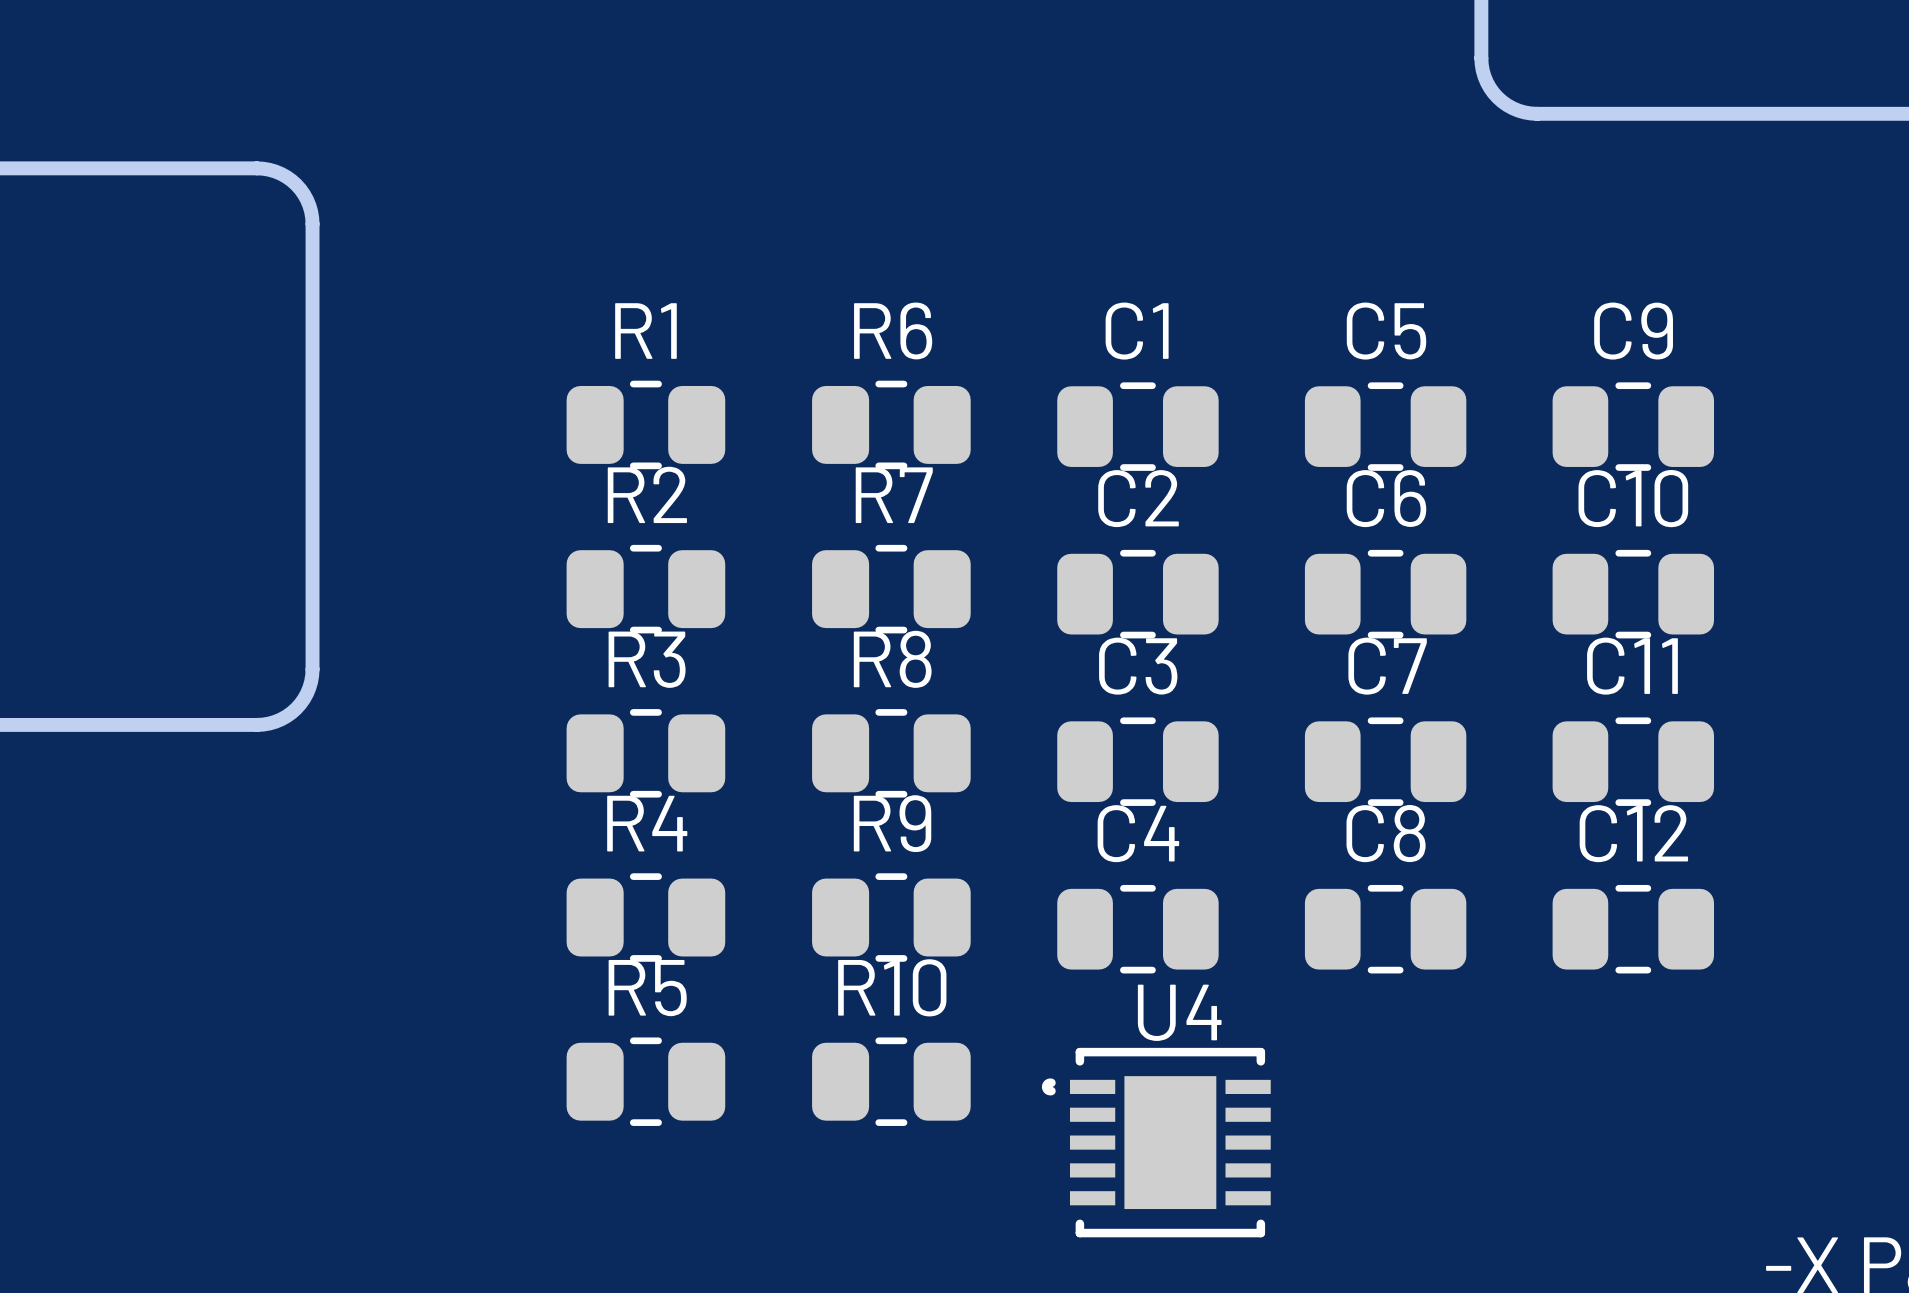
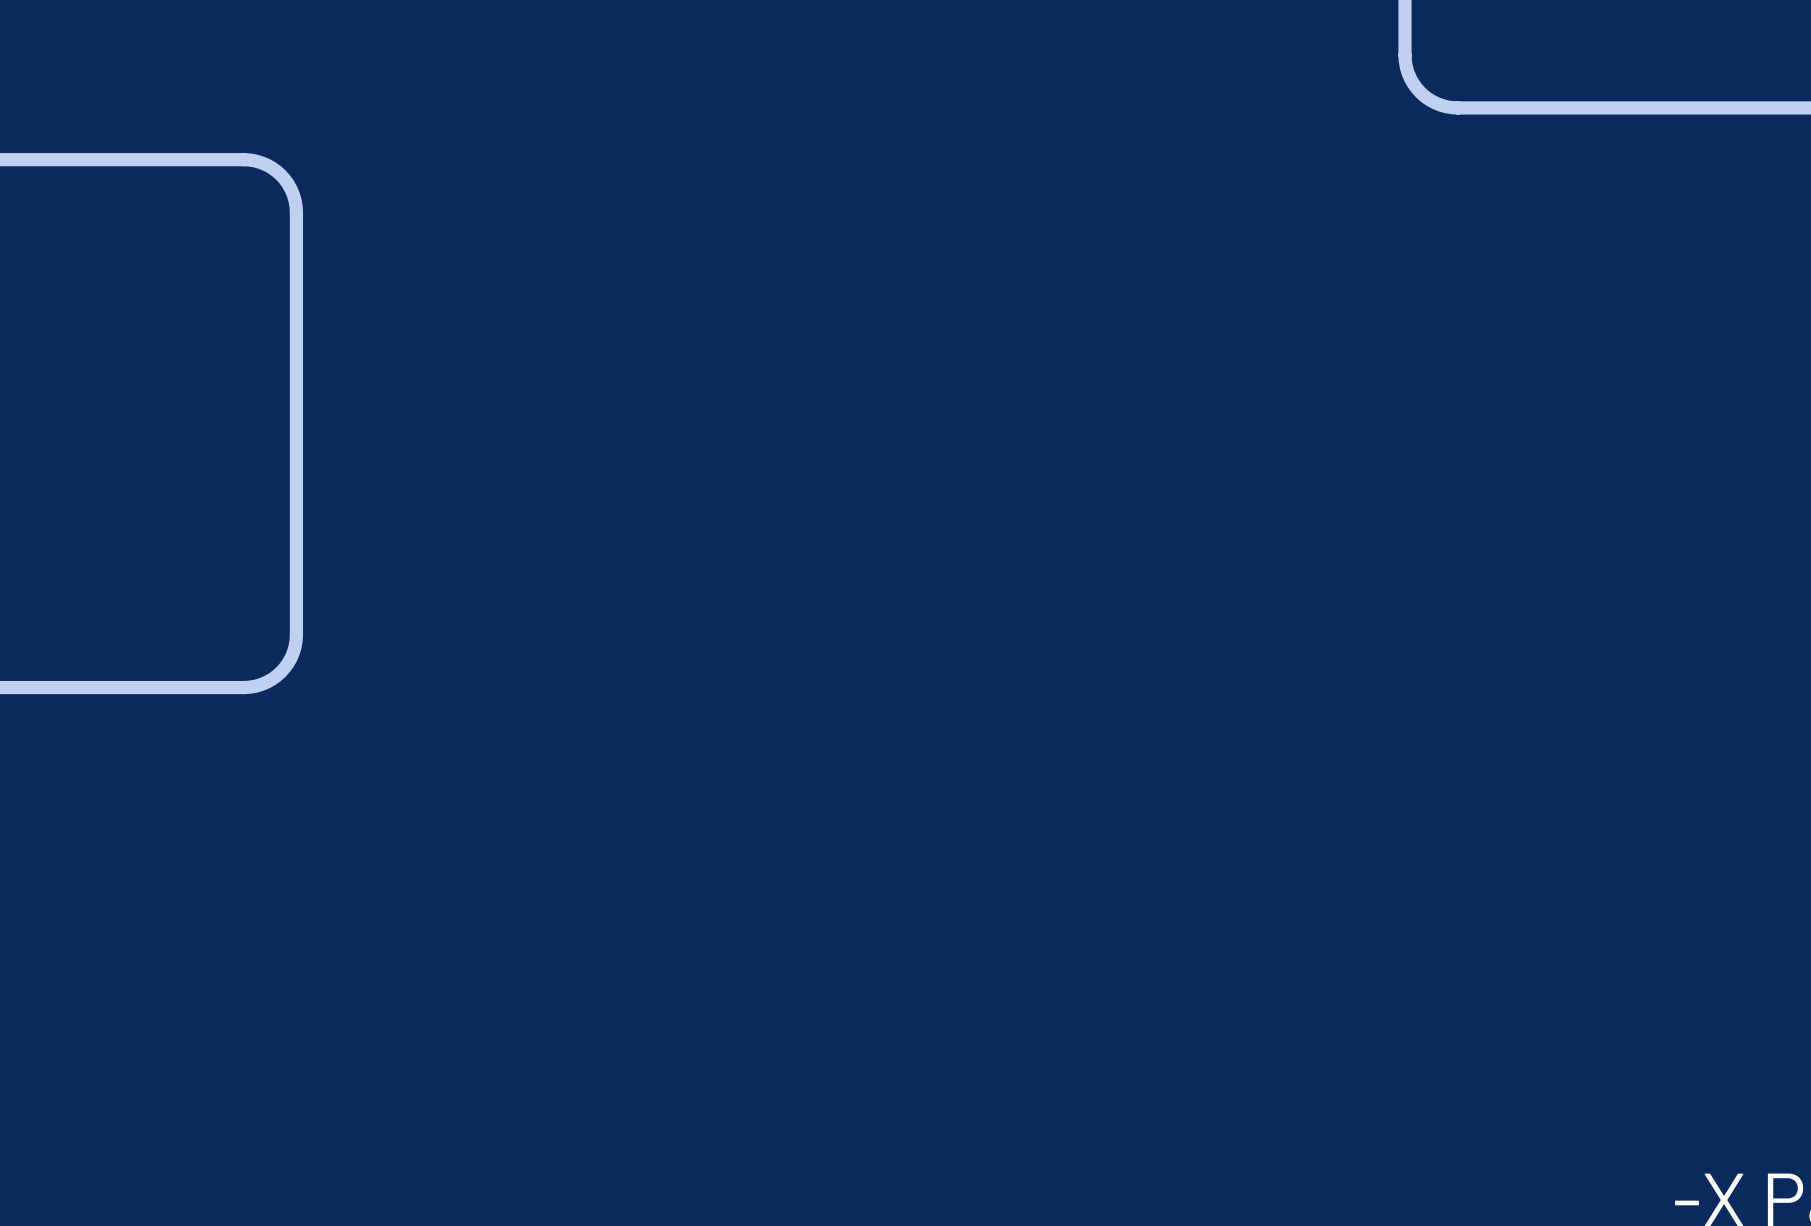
R1: (645, 424) -> none
R6: (891, 424) -> none
C1: (1137, 426) -> none
C5: (1385, 426) -> none
C9: (1633, 426) -> none
R2: (645, 589) -> none
R7: (891, 589) -> none
C2: (1137, 594) -> none
C6: (1385, 594) -> none
C10: (1633, 594) -> none
R3: (645, 753) -> none
R8: (891, 753) -> none
C3: (1137, 761) -> none
C7: (1385, 761) -> none
C11: (1633, 761) -> none
R4: (645, 917) -> none
R9: (891, 917) -> none
C4: (1137, 929) -> none
C8: (1385, 929) -> none
C12: (1633, 929) -> none
R5: (645, 1081) -> none
R10: (891, 1081) -> none
U4: (1156, 1142) -> none

